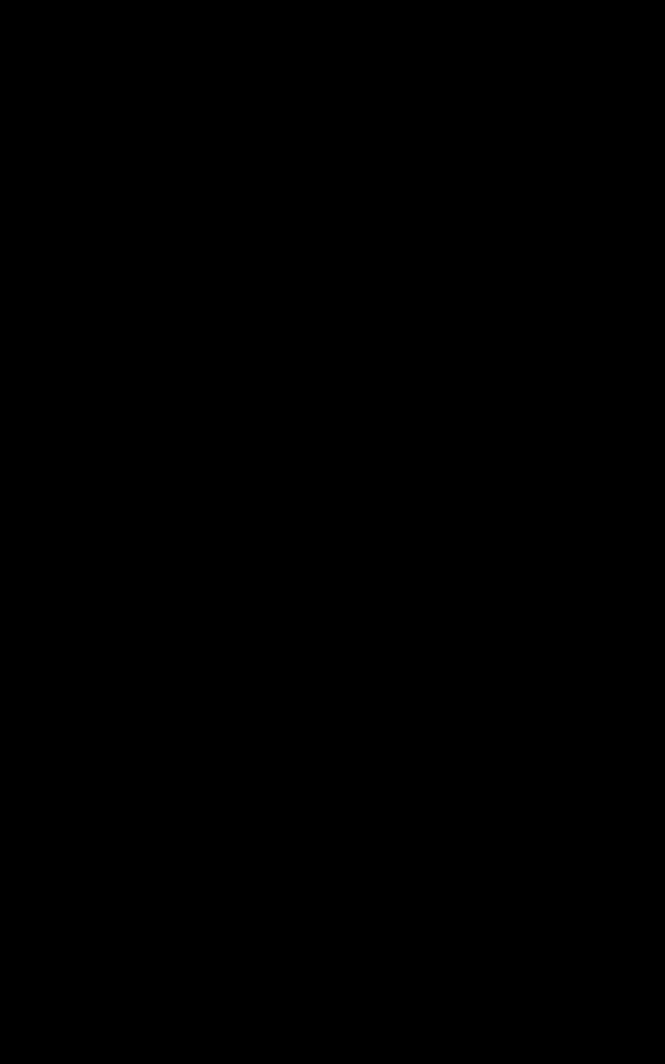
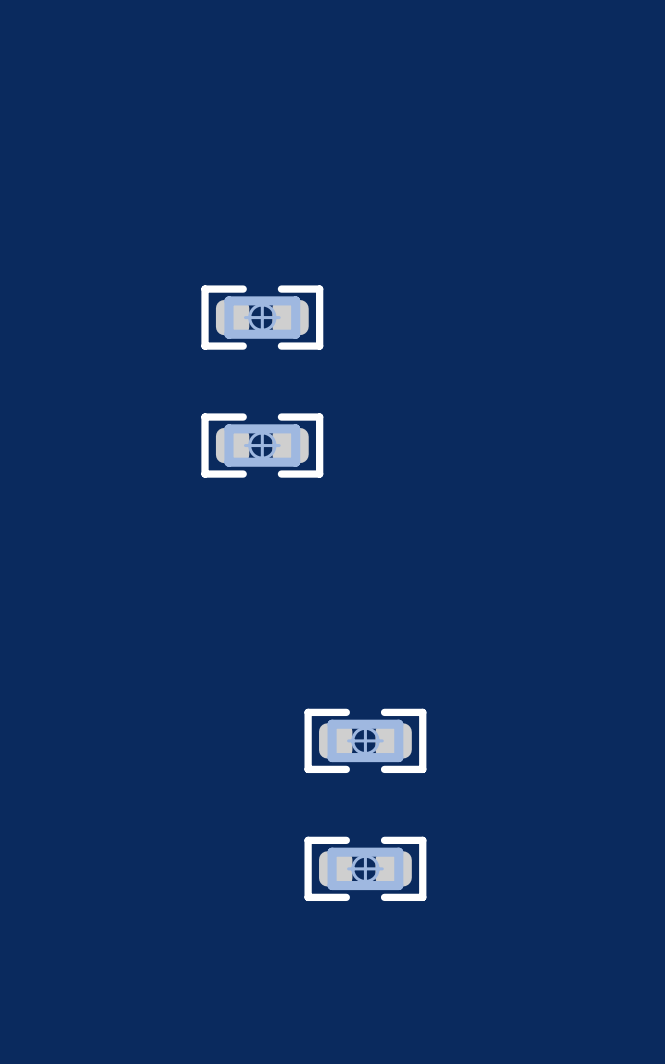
part: none -> (262, 317)
part: none -> (262, 445)
part: none -> (365, 740)
part: none -> (365, 868)

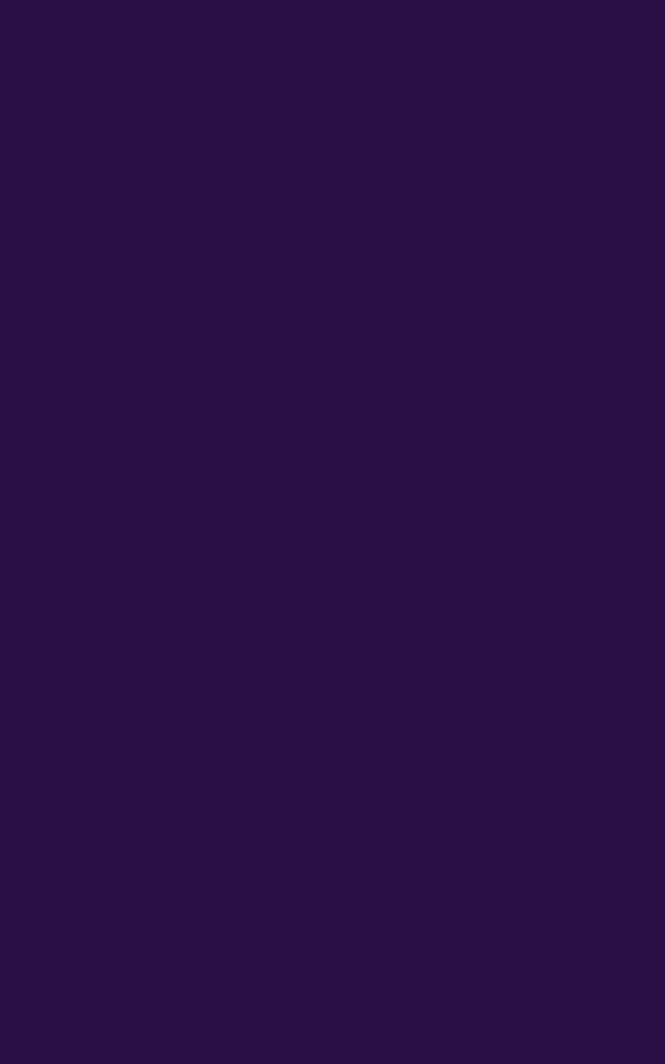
part: (262, 317) -> none
part: (262, 445) -> none
part: (365, 740) -> none
part: (365, 868) -> none

